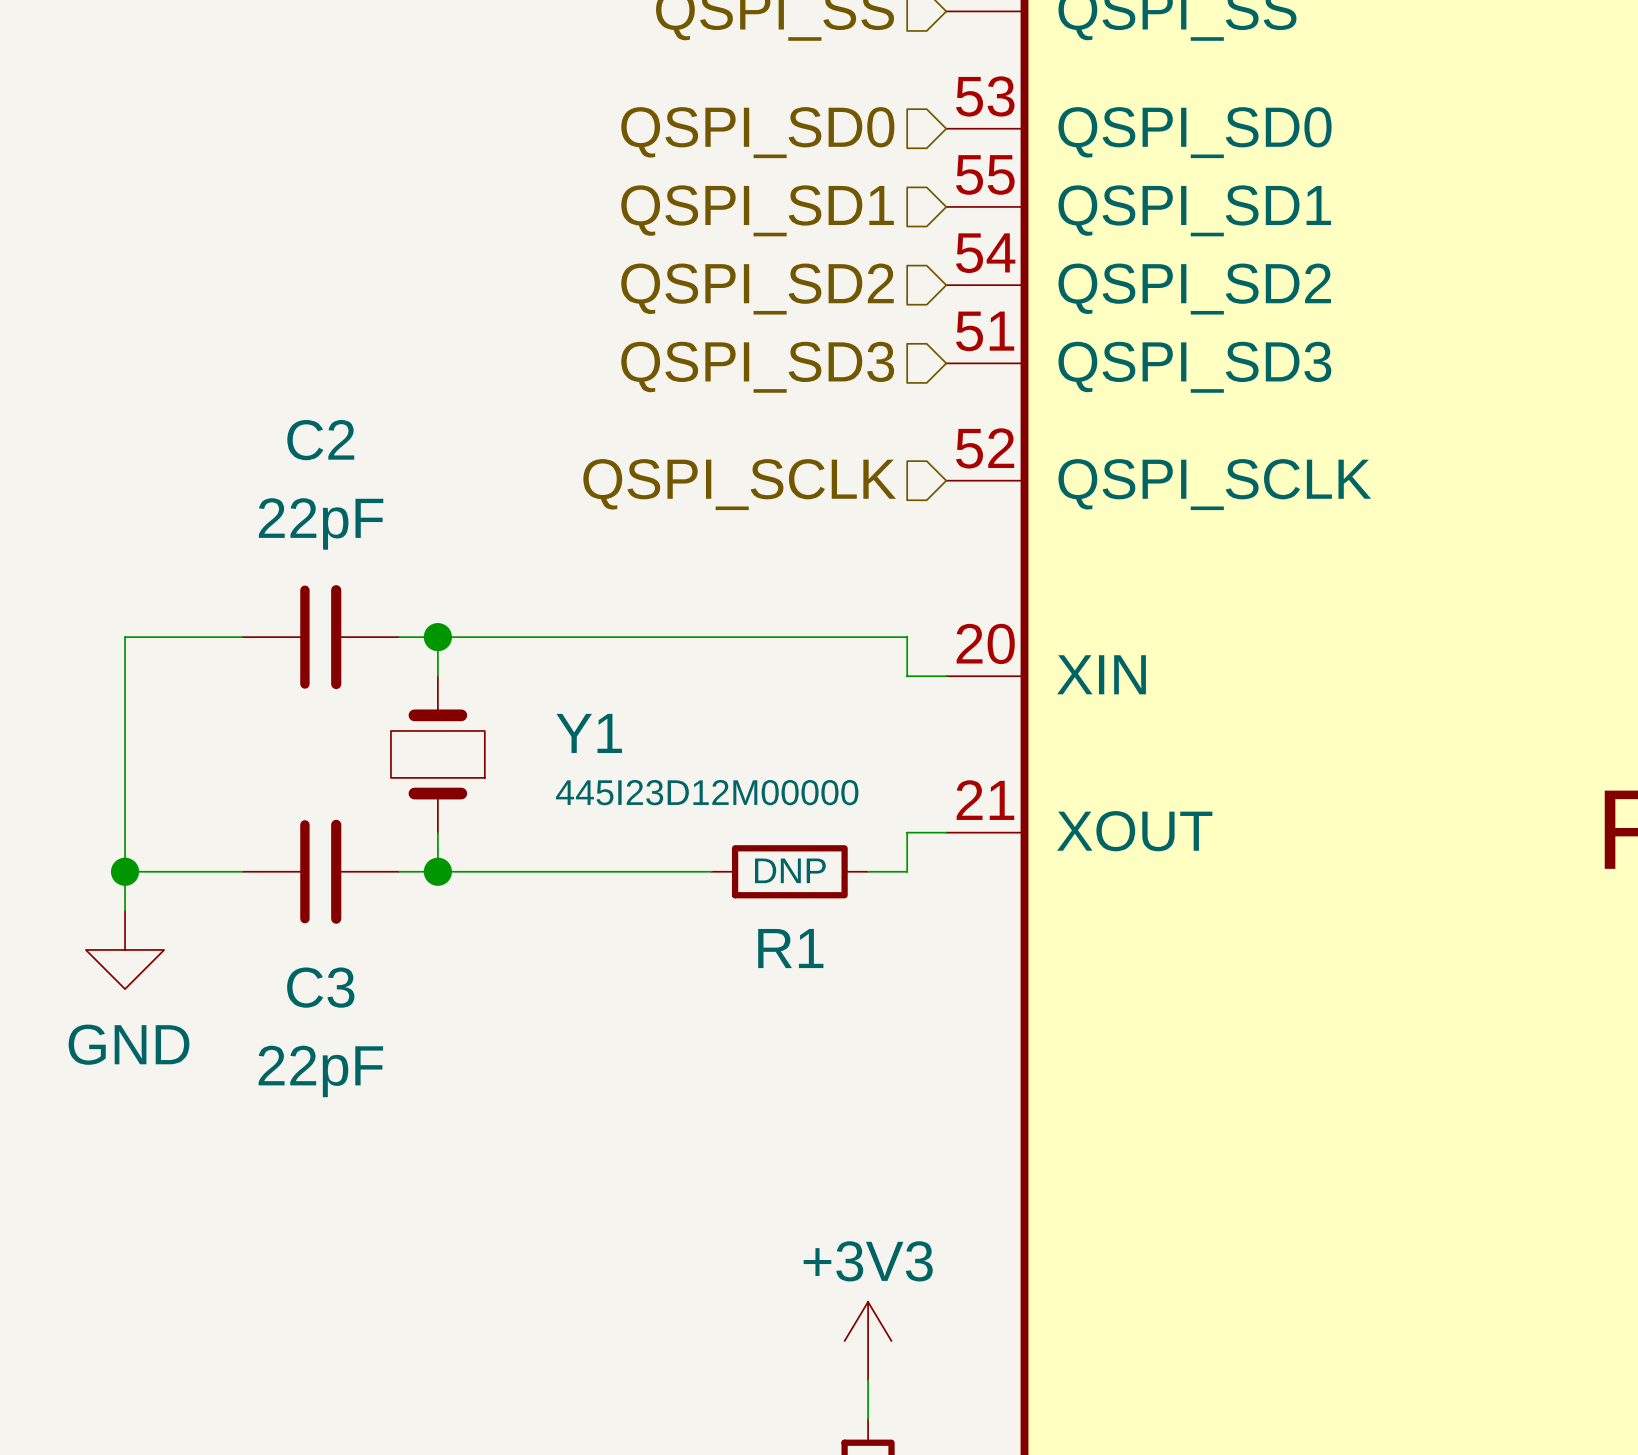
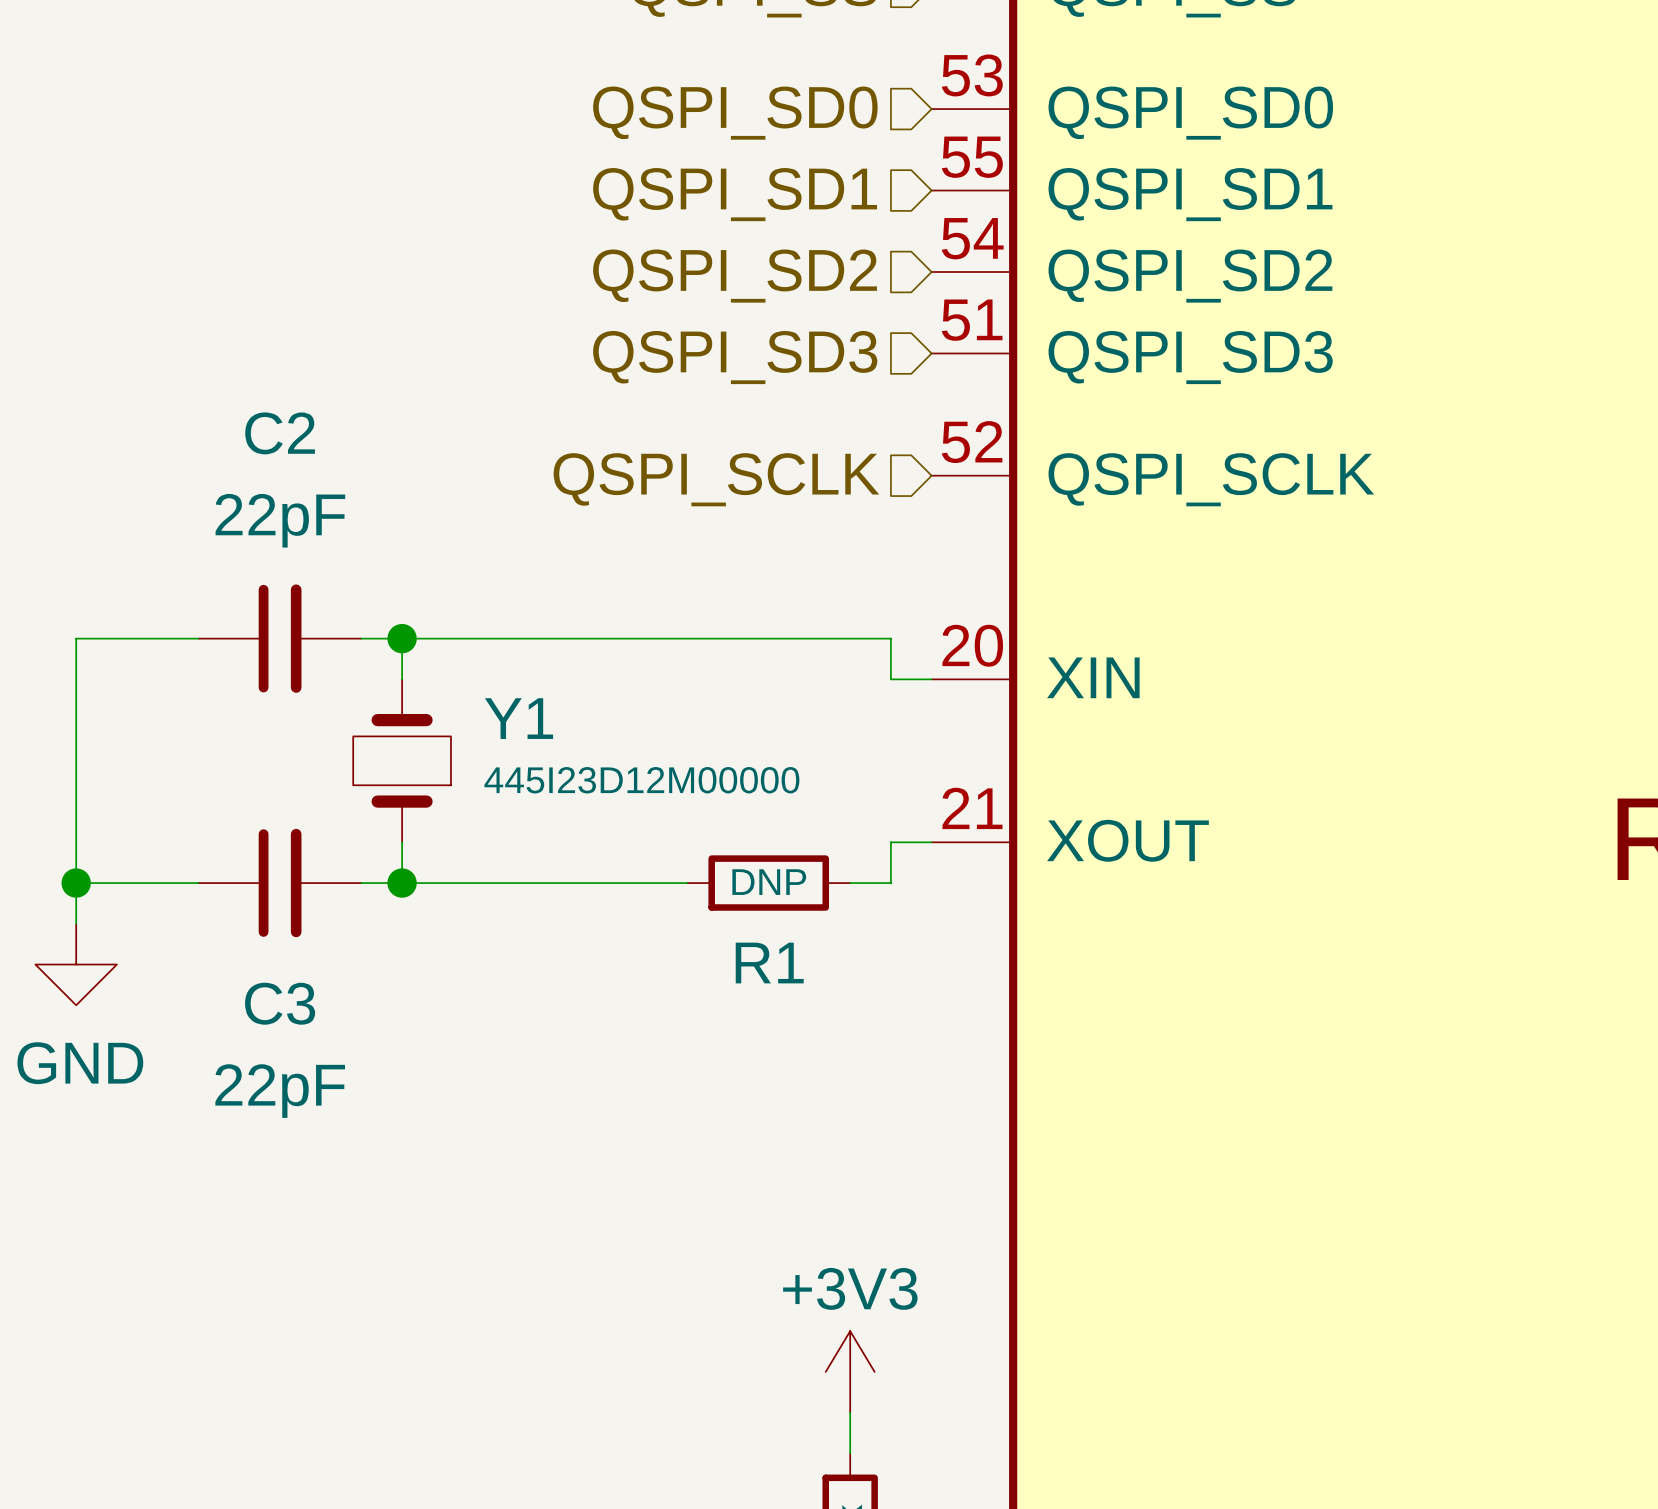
Y1 name position: Y1 (589, 733) -> Y1 (518, 718)
Y1 value position: 445I23D12M00000 (707, 792) -> 445I23D12M00000 (641, 780)

